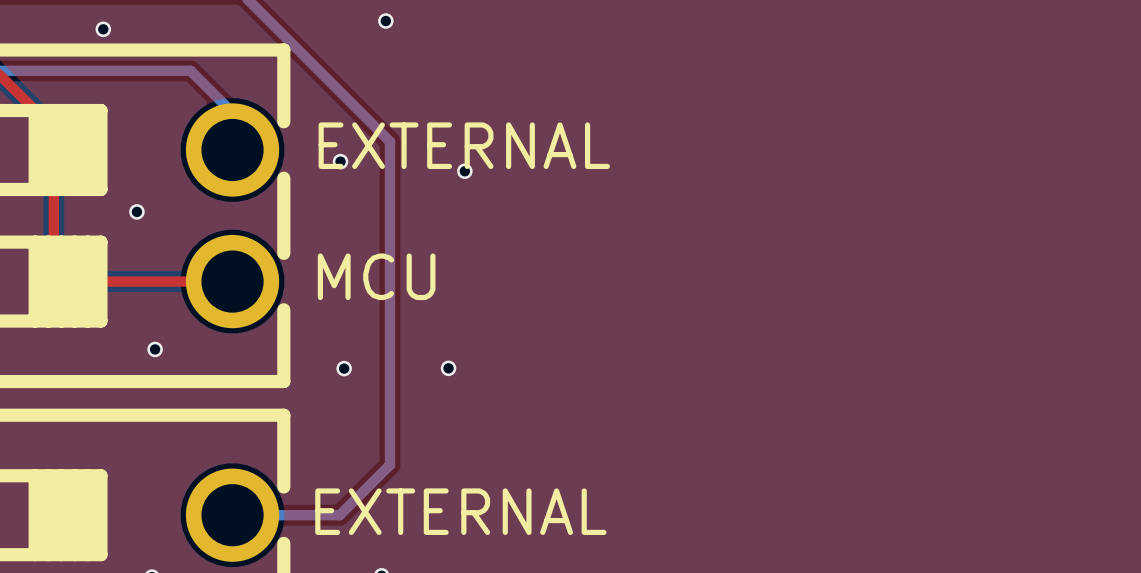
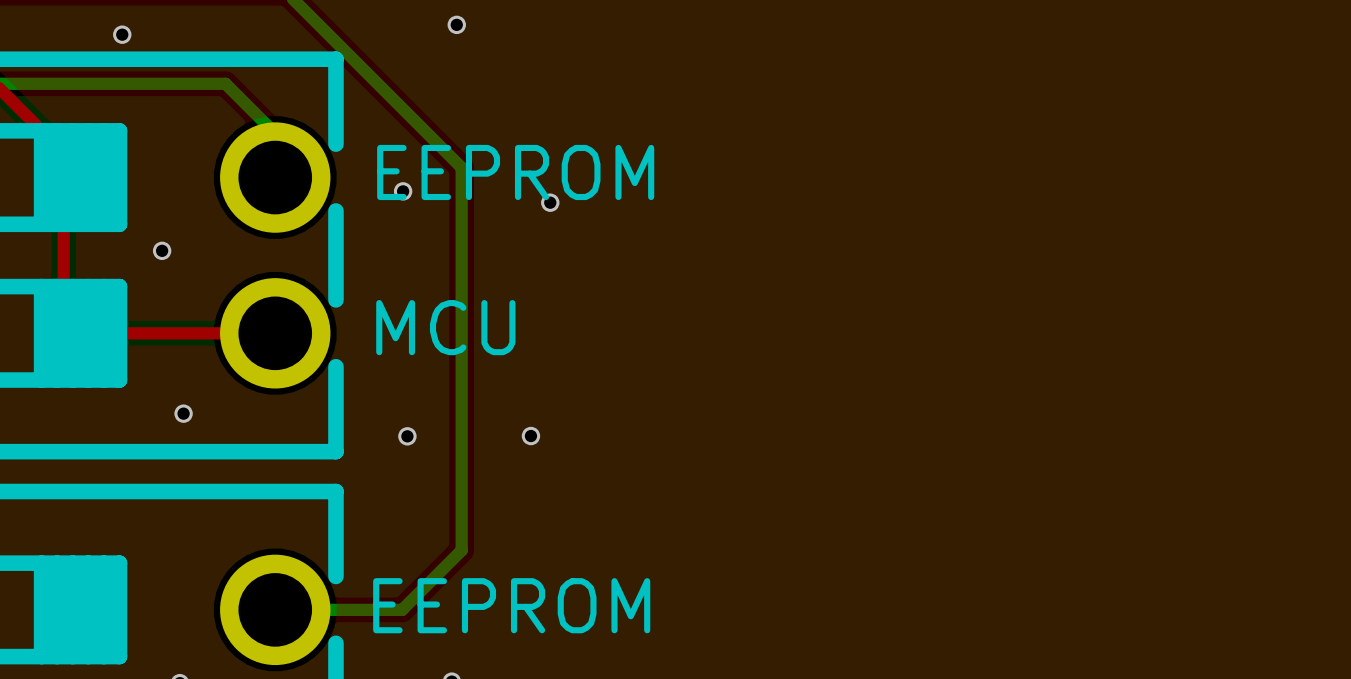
text: EXTERNAL (464, 145) -> EEPROM (515, 172)
text: EXTERNAL (460, 511) -> EEPROM (511, 605)

